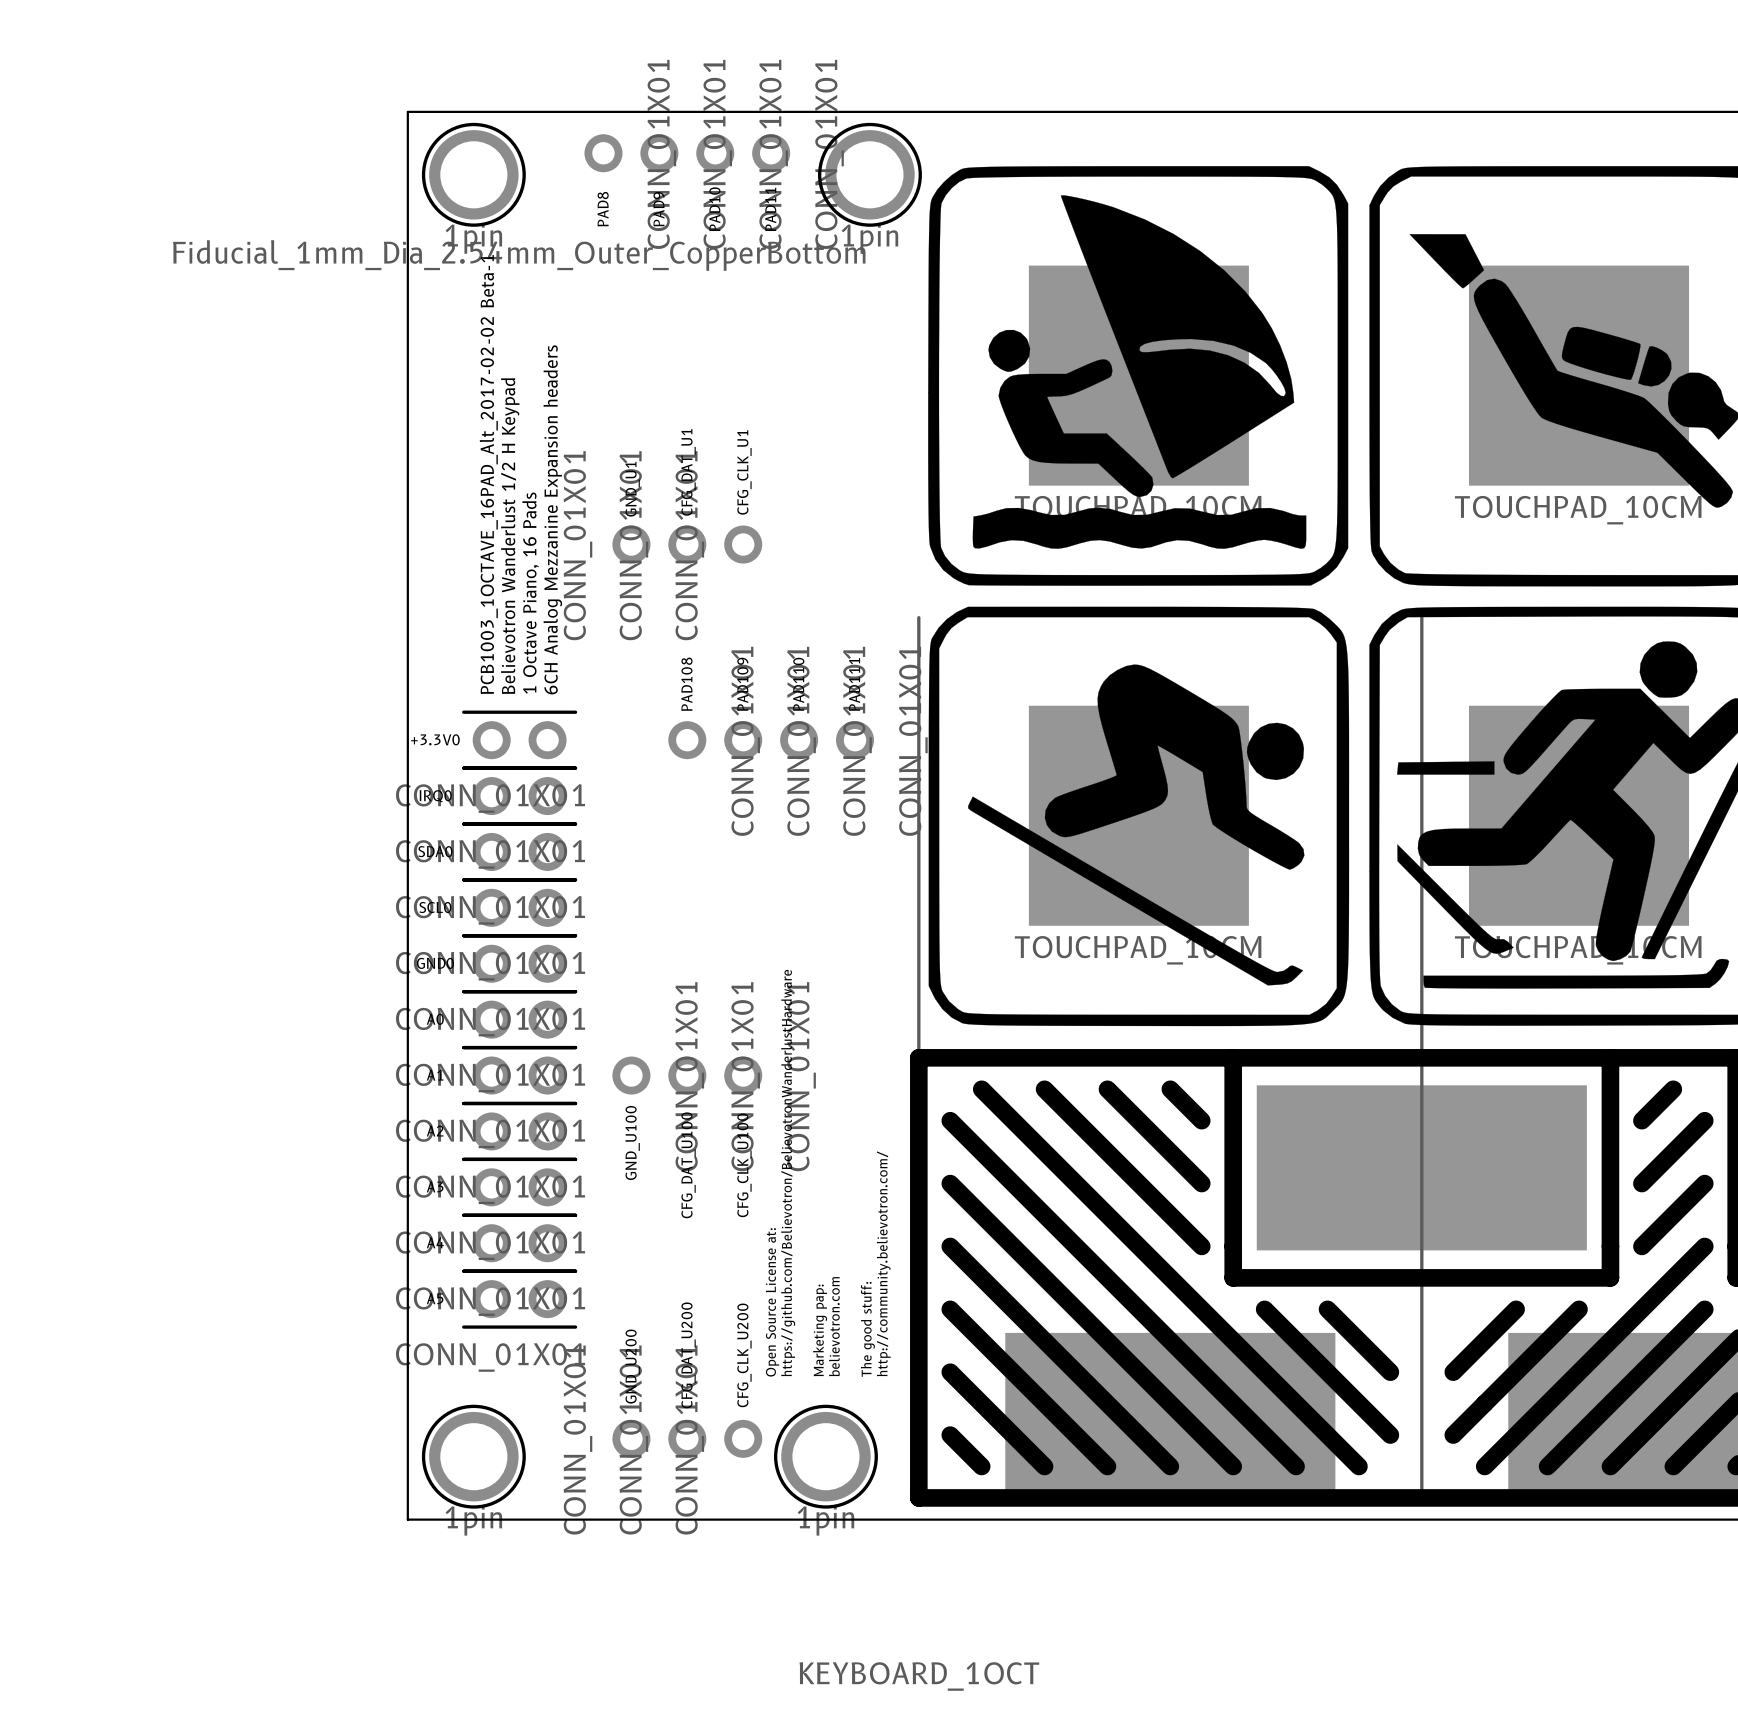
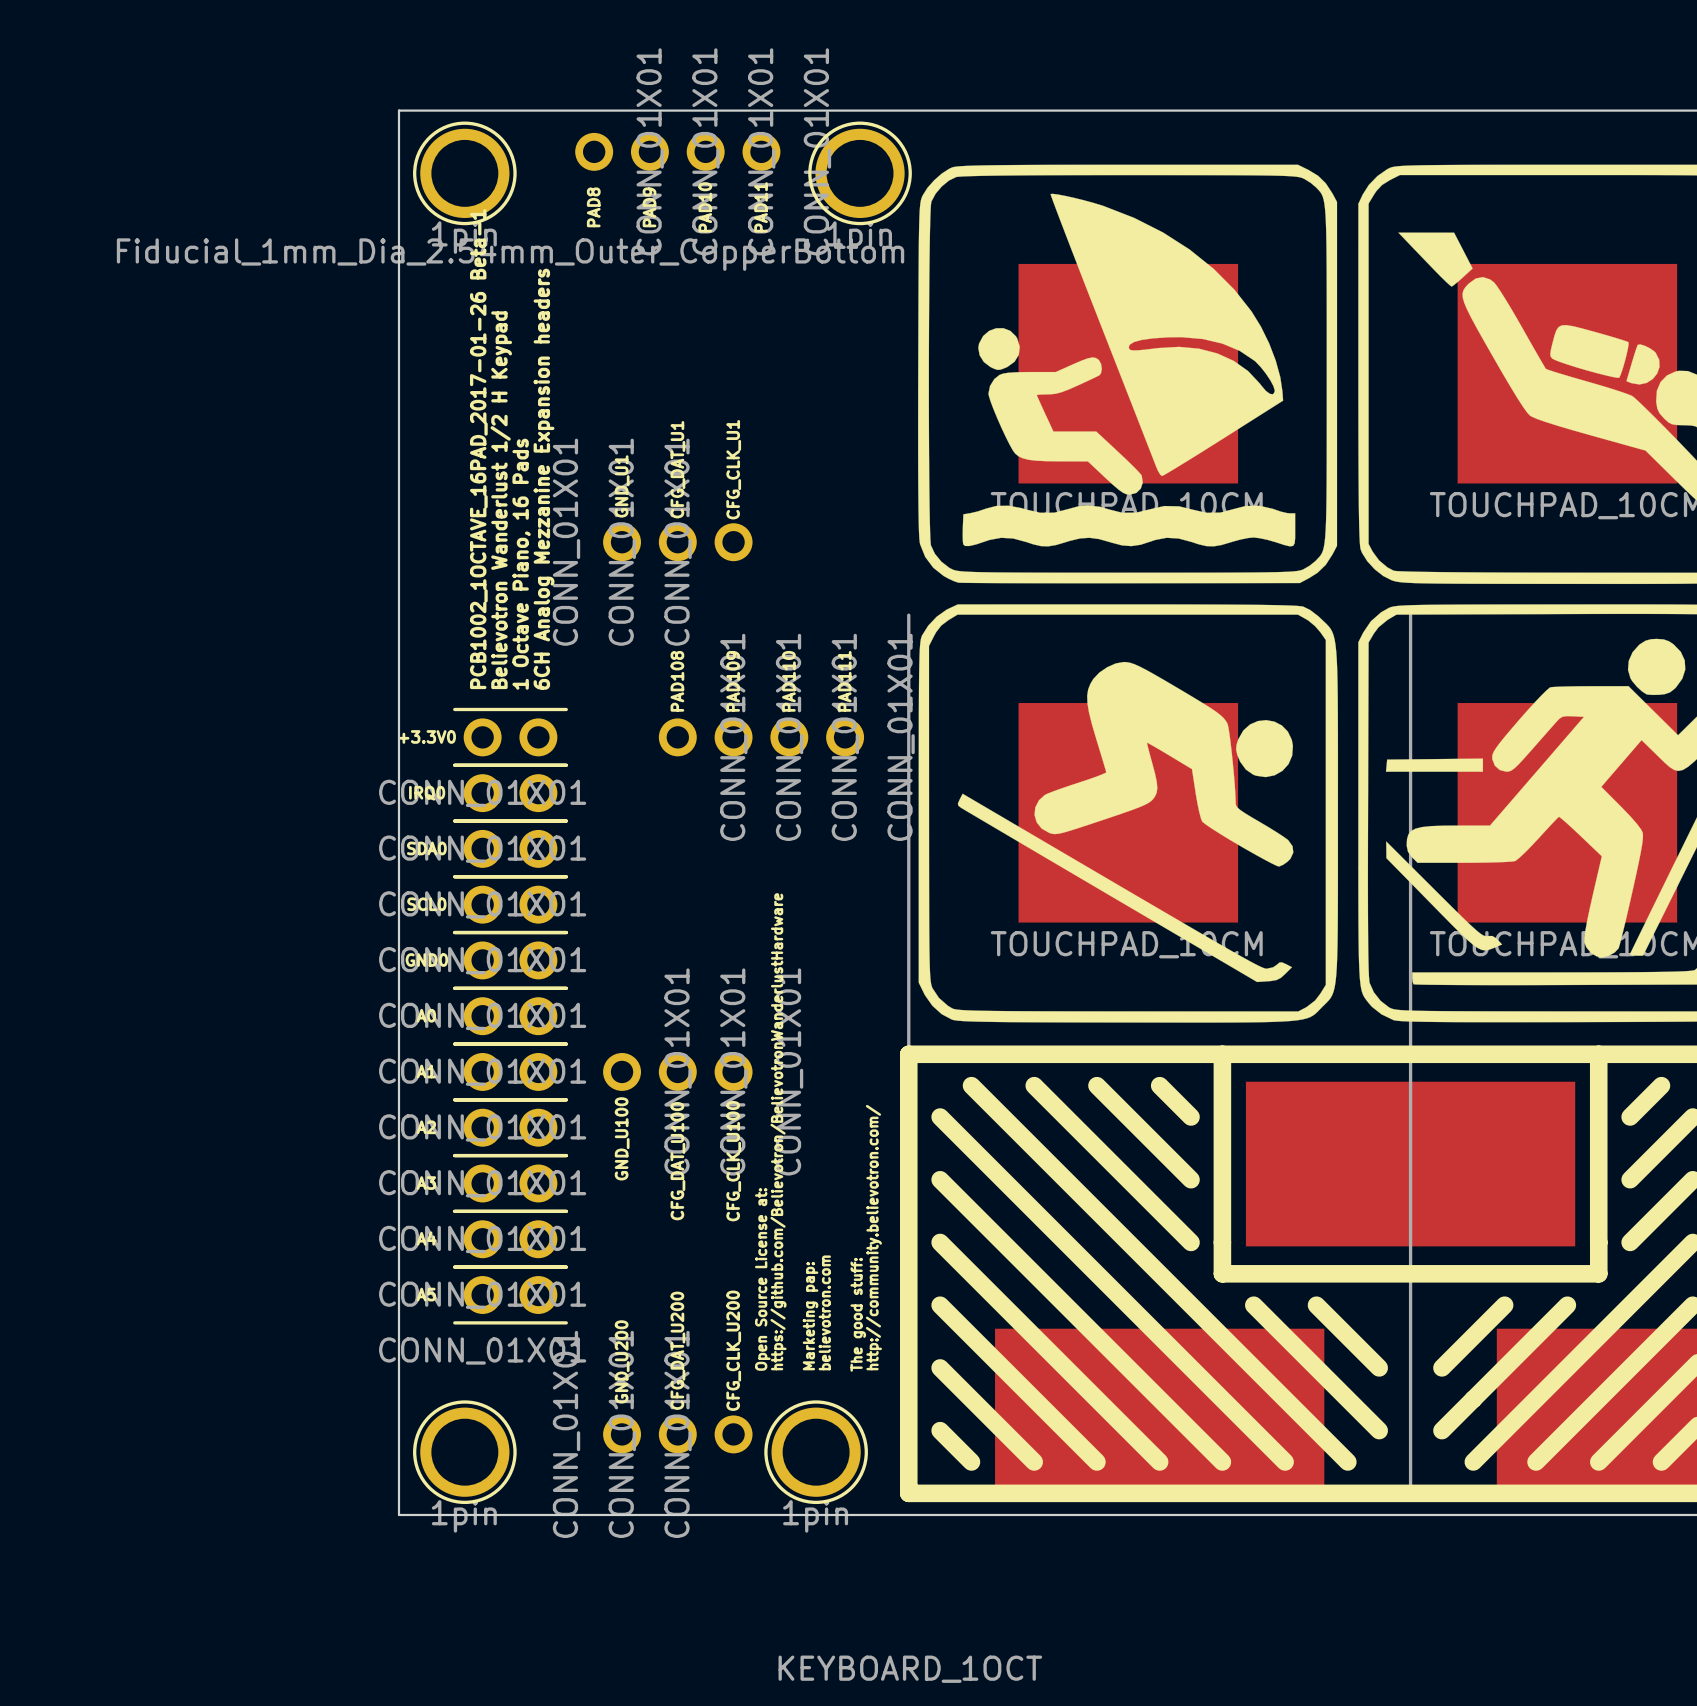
text: PCB1003_1OCTAVE_16PAD_Alt_2017-02-02 Beta-1 (488, 474) -> PCB1002_1OCTAVE_16PAD_2017-01-26 Beta-1 (478, 449)

